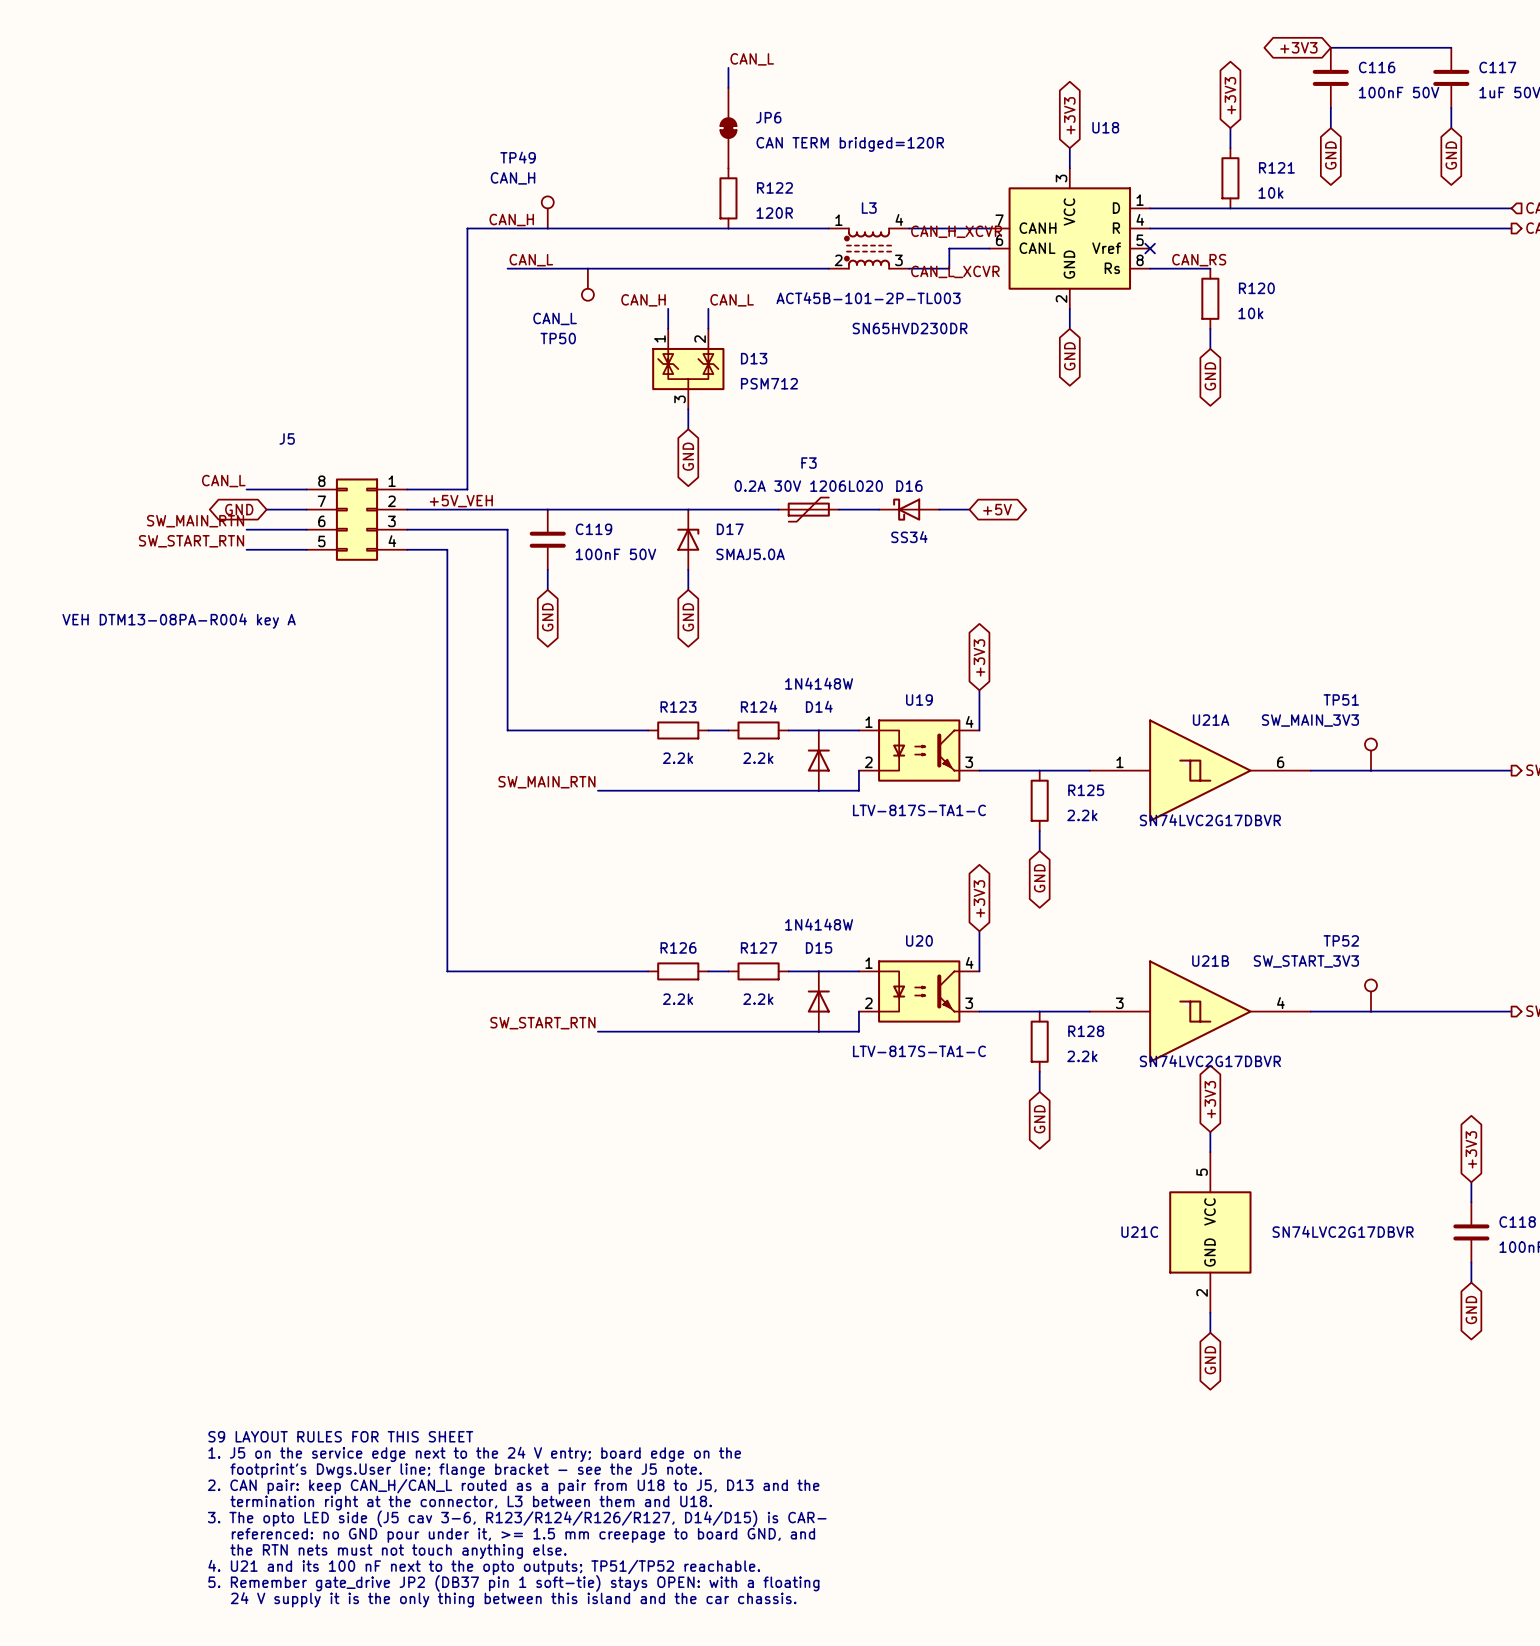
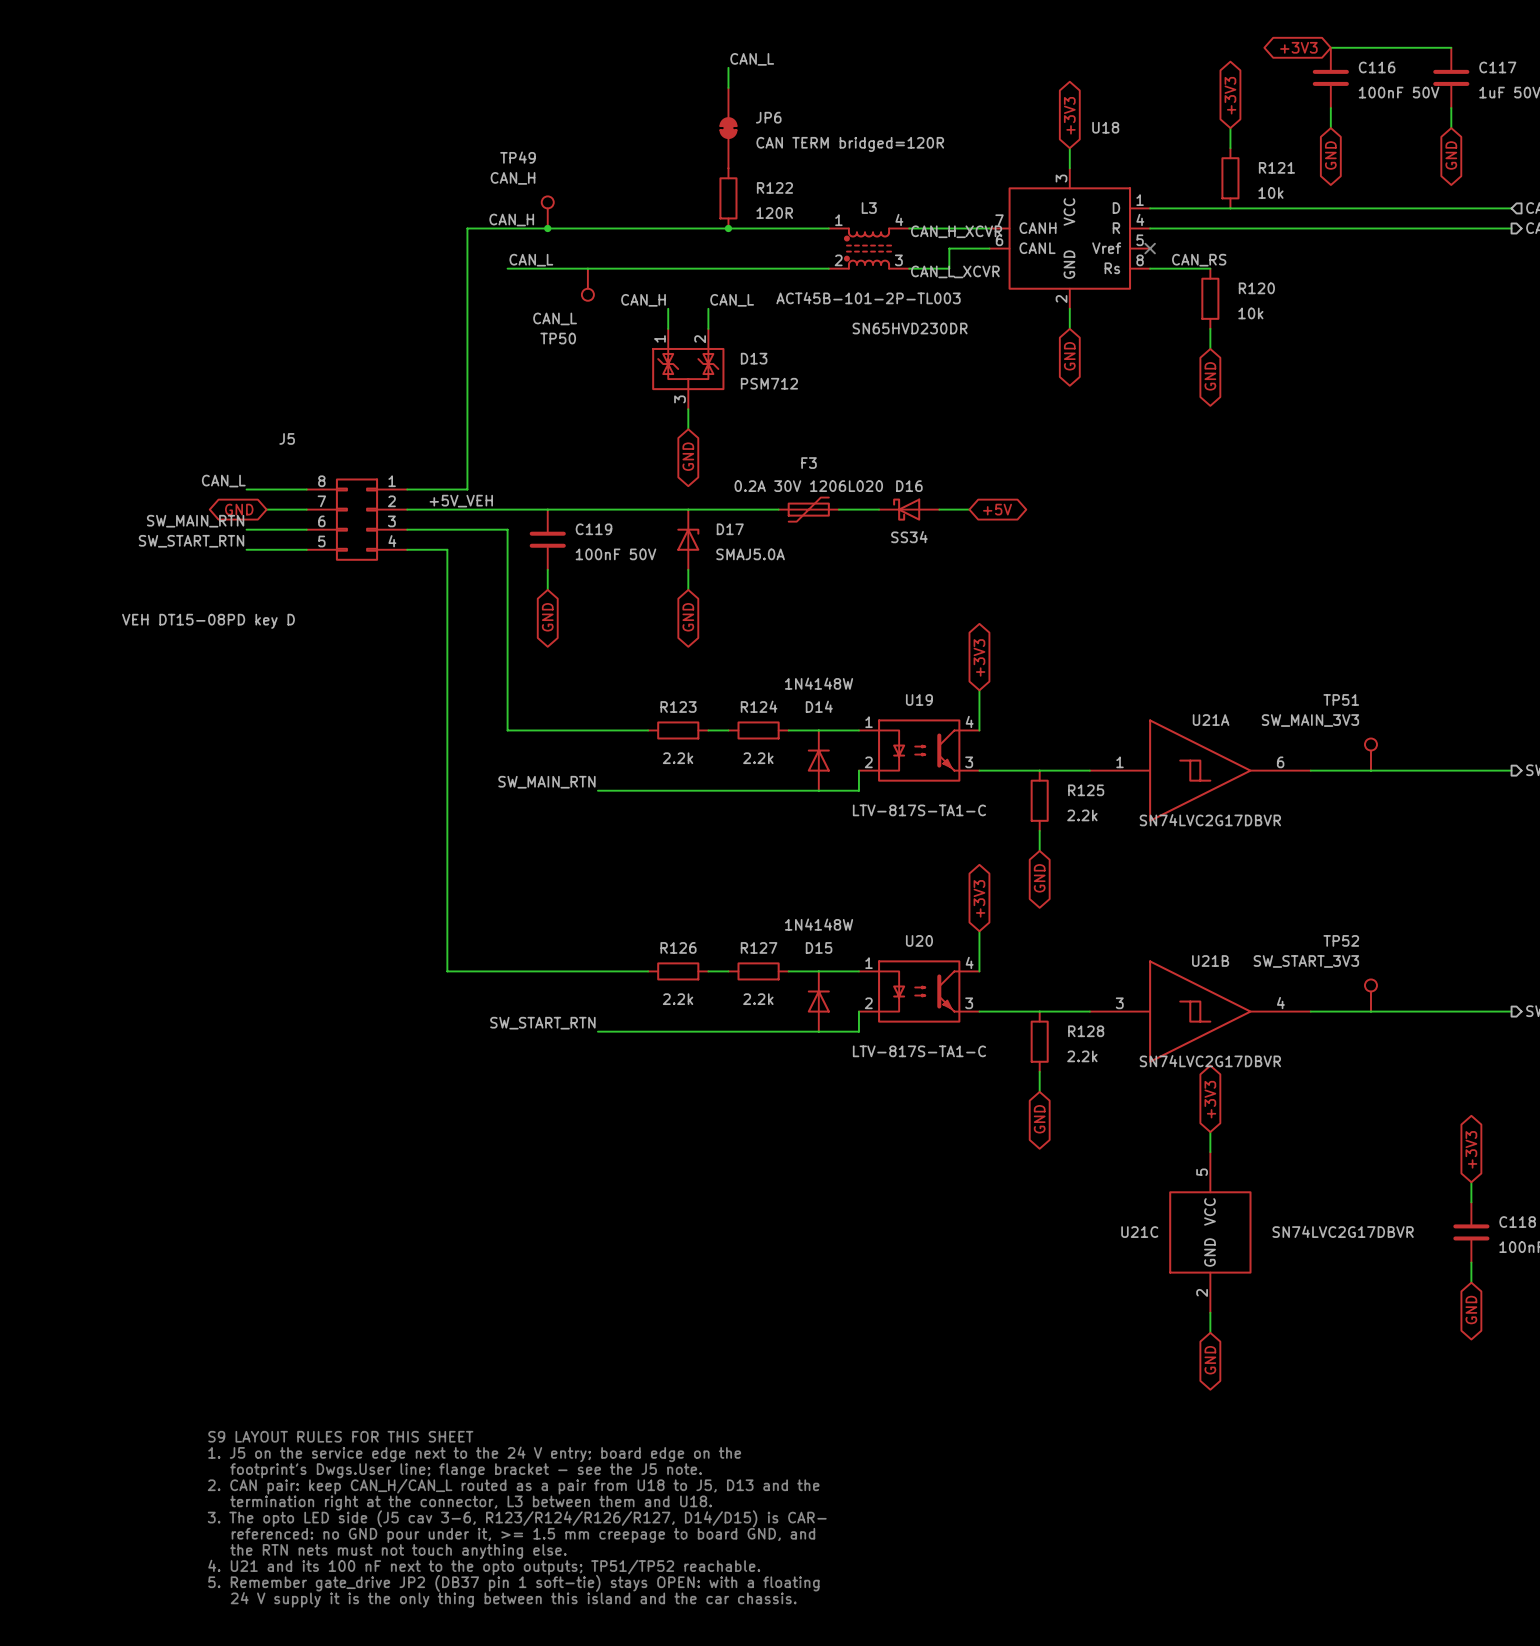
junction: none -> (547, 228)
junction: none -> (728, 228)
J5 value: VEH DTM13-08PA-R004 key A (179, 621) -> VEH DT15-08PD key D (208, 621)

